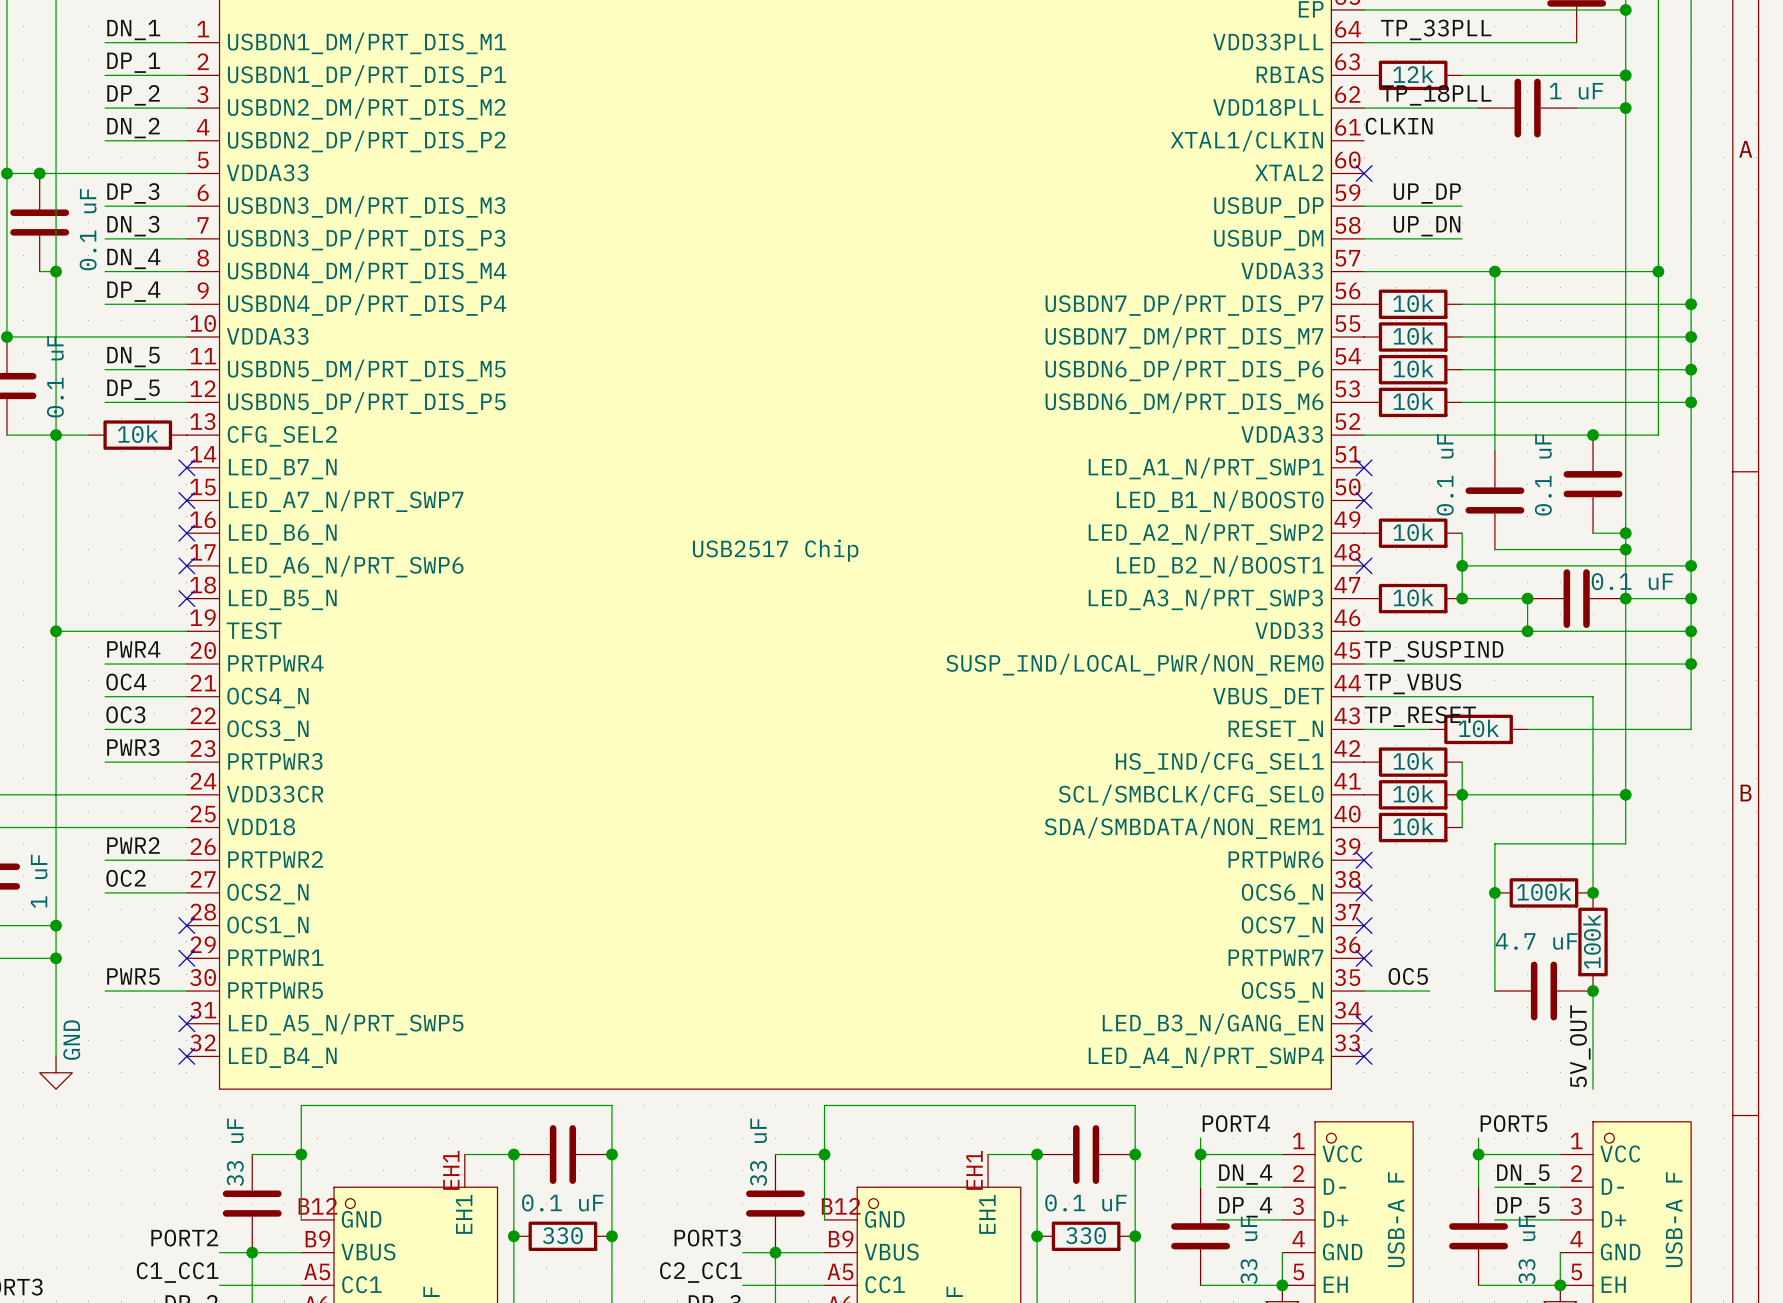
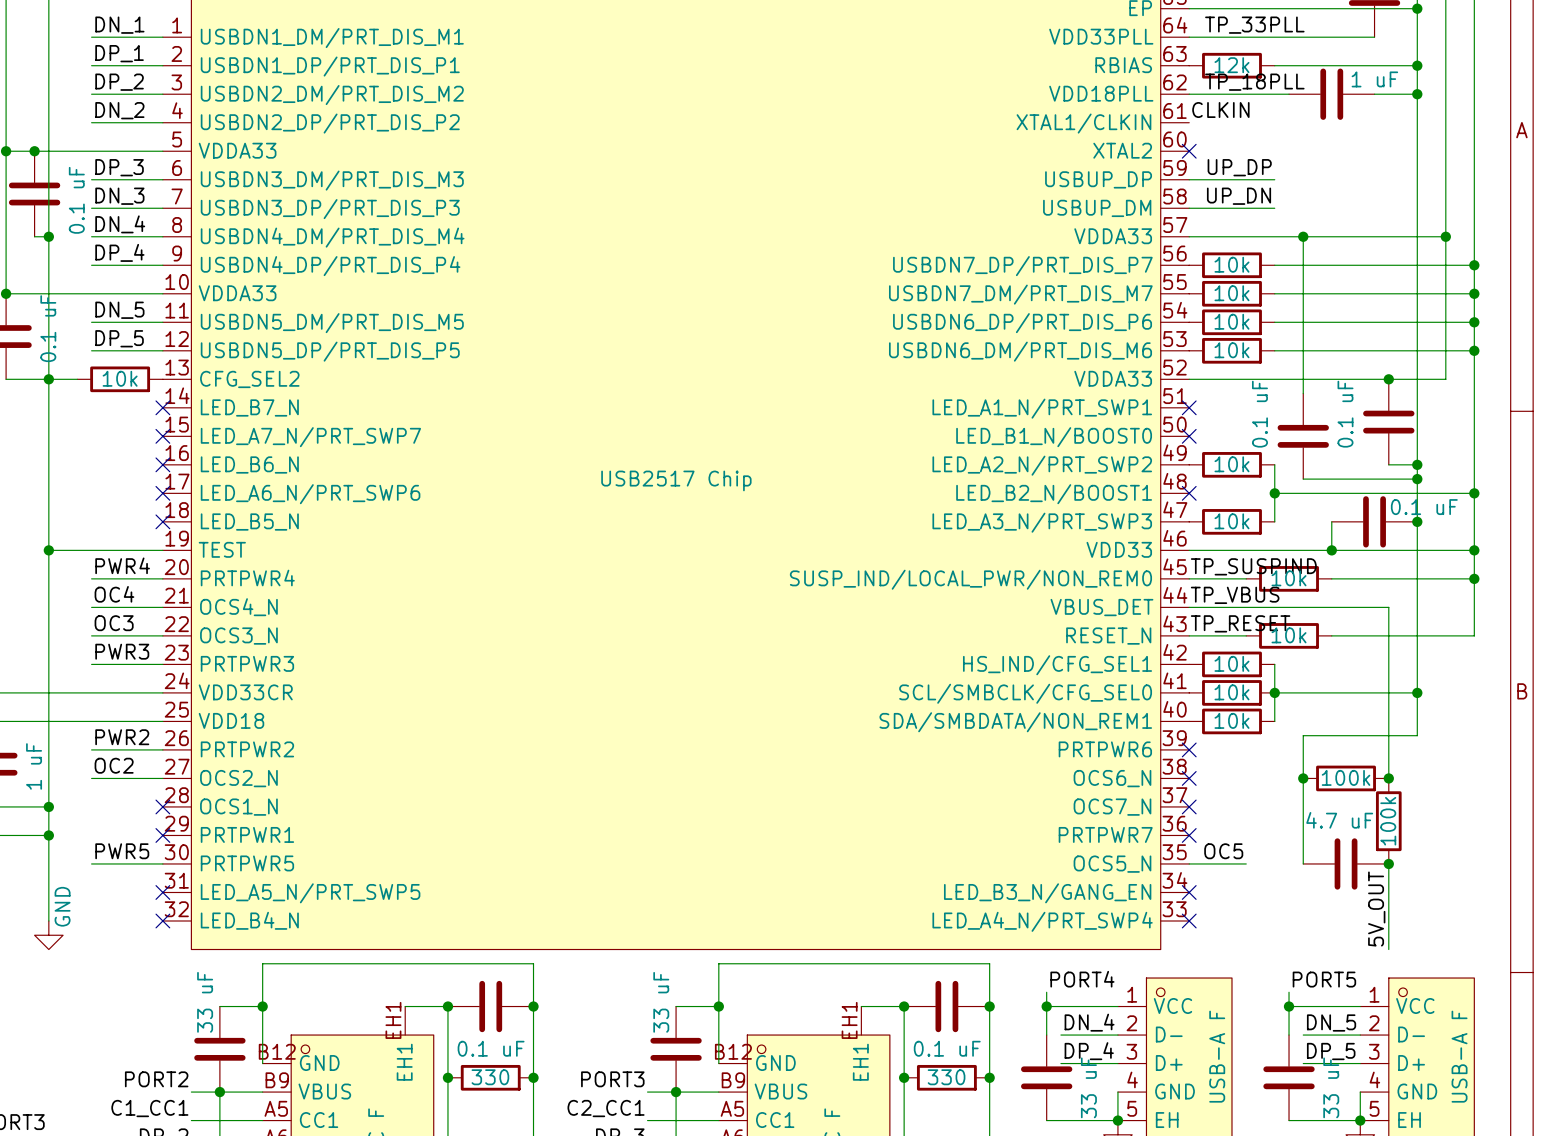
wire: (1462, 598) (1527, 598) -> none
junction: (1462, 598) -> none
junction: (1527, 598) -> none
wire: (1625, 598) (1691, 598) -> none
junction: (1691, 598) -> none
wire: (1429, 664) (1527, 664) -> none
part: none -> 10k (1289, 578)

